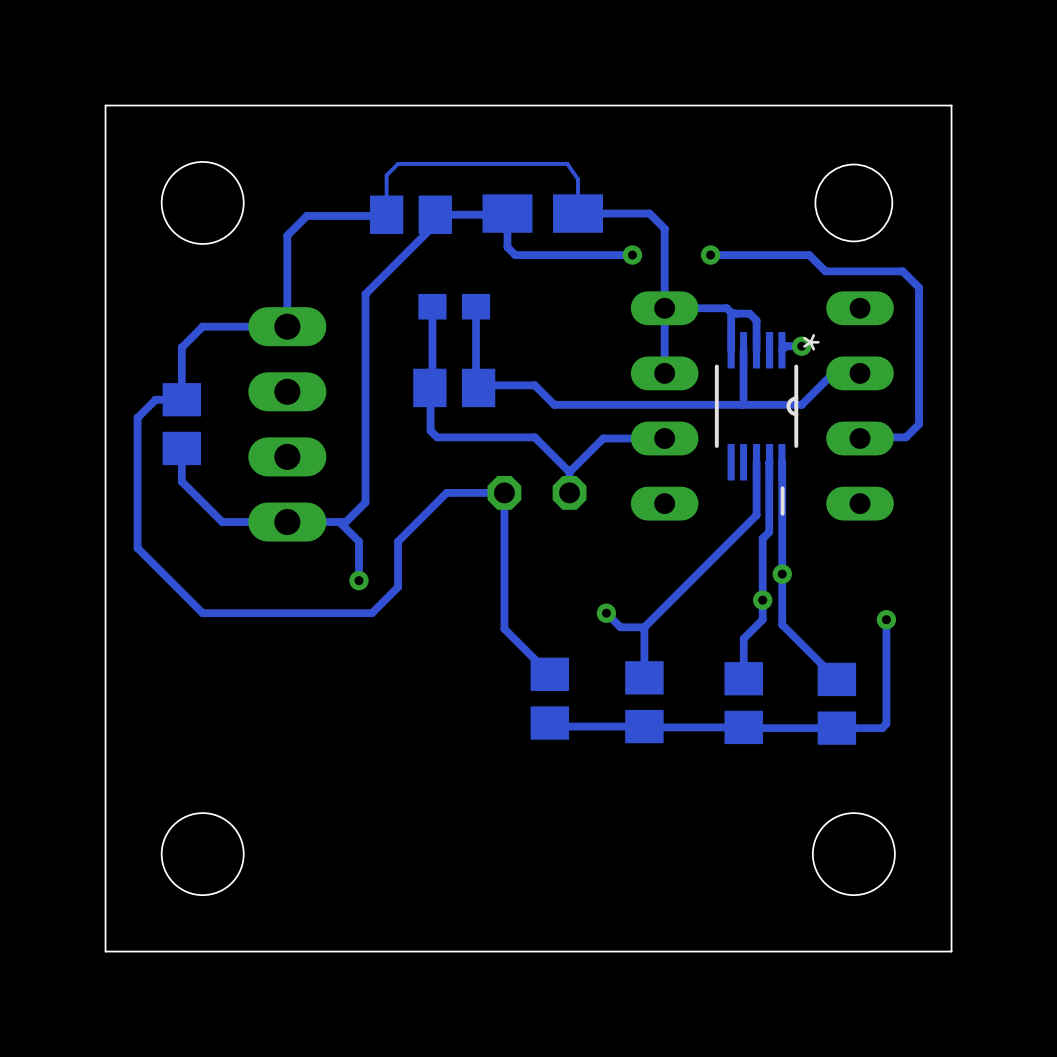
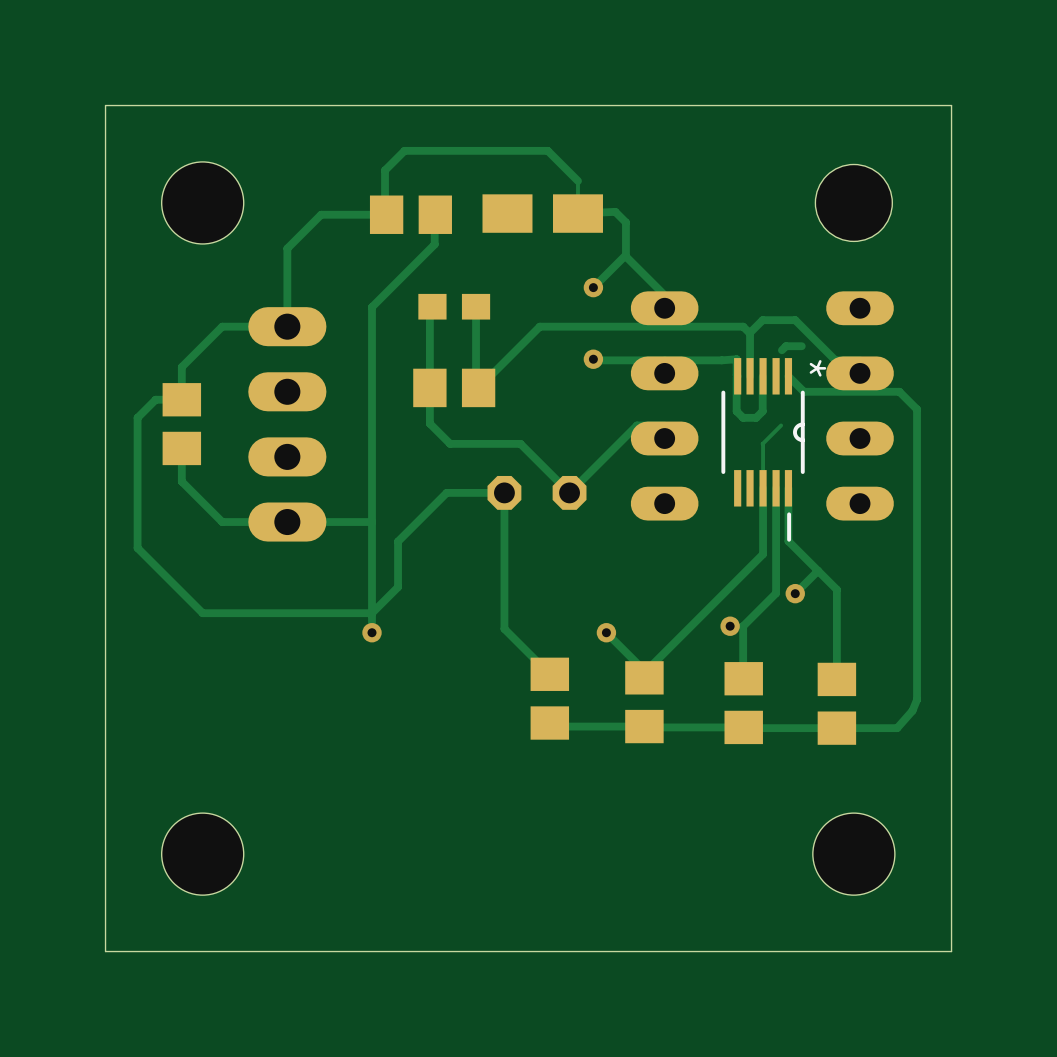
track: (577, 181) (567, 163) (398, 163) (386, 175) (385, 215) (306, 215) (287, 235) (287, 248) -> (577, 181) (547, 150) (404, 150) (385, 170) (385, 213) (386, 214) (321, 214) (287, 248)
track: none -> (434, 212) (434, 244) (372, 307) (372, 632)
track: (577, 213) (649, 213) (665, 229) -> (577, 213) (615, 211) (625, 222) (625, 256)
track: (664, 229) (664, 373) -> none
track: (632, 255) (515, 255) (507, 247) (507, 213) (435, 214) (435, 224) (365, 294) (365, 502) (345, 522) -> (372, 522) (345, 522)
via position: (632, 255) -> (593, 287)
track: (710, 255) (809, 255) (825, 271) (902, 271) (918, 287) (918, 424) (905, 437) (860, 438) -> none
via: (710, 255) -> none
track: none -> (625, 256) (664, 295)
track: none -> (625, 256) (593, 287)
track: (432, 306) (430, 430) (437, 437) (534, 437) (569, 472) -> (432, 306) (429, 309) (429, 423) (450, 443) (520, 443) (569, 492) (636, 425) (664, 425)
track: (664, 308) (726, 308) (731, 312) -> none
track: (731, 312) (731, 350) -> none
track: (731, 312) (749, 313) (756, 320) (756, 350) -> none
track: (222, 326) (202, 326) (181, 347) (181, 367) -> (222, 326) (181, 367)
track: none -> (750, 333) (750, 376)
via: (801, 346) -> none
track: (743, 350) (743, 404) -> none
track: none -> (593, 359) (664, 360)
via: none -> (593, 359)
track: none -> (665, 360) (736, 359) (736, 411) (743, 417) (756, 417) (762, 411) (762, 376)
track: none -> (860, 360) (835, 360) (795, 320) (762, 320) (749, 333) (743, 326) (539, 326) (478, 387)
track: (860, 373) (833, 373) (801, 404) (554, 404) (534, 385) (476, 385) -> none
part position: (756, 423) -> (763, 449)
track: none -> (781, 425) (762, 443)
track: (664, 438) (603, 438) (569, 472) -> none
track: none -> (763, 444) (763, 554) (644, 672)
track: (756, 462) (756, 515) (644, 627) -> none
track: (769, 462) (769, 532) (762, 538) (762, 619) (743, 638) (743, 678) -> (743, 626) (743, 678)
track: (782, 462) (782, 624) (836, 679) -> (788, 488) (788, 541) (836, 589) (836, 679)
track: none -> (776, 488) (776, 593) (743, 626)
track: (339, 522) (358, 541) (358, 580) -> none
track: none -> (818, 570) (795, 593)
via: (782, 574) -> none
via position: (358, 580) -> (372, 632)
via: none -> (795, 593)
via: (762, 600) -> none
track: (606, 613) (620, 627) (644, 627) -> none
via position: (606, 613) -> (606, 632)
track: (886, 619) (886, 723) (882, 728) -> (788, 376) (803, 391) (899, 391) (917, 409) (917, 699) (912, 710) (897, 728) (882, 728)
via: (886, 619) -> none
via: none -> (730, 626)
track: (644, 627) (644, 677) -> none
track: none -> (606, 632) (644, 670)

